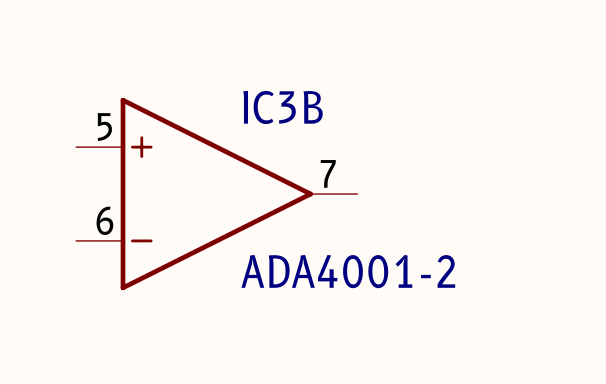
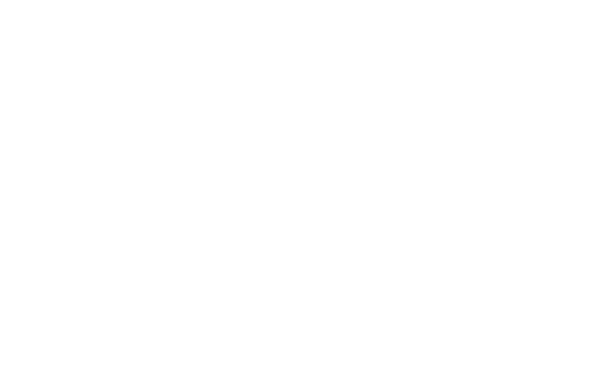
IC3B: ADA4001-2 (216, 194) -> none

